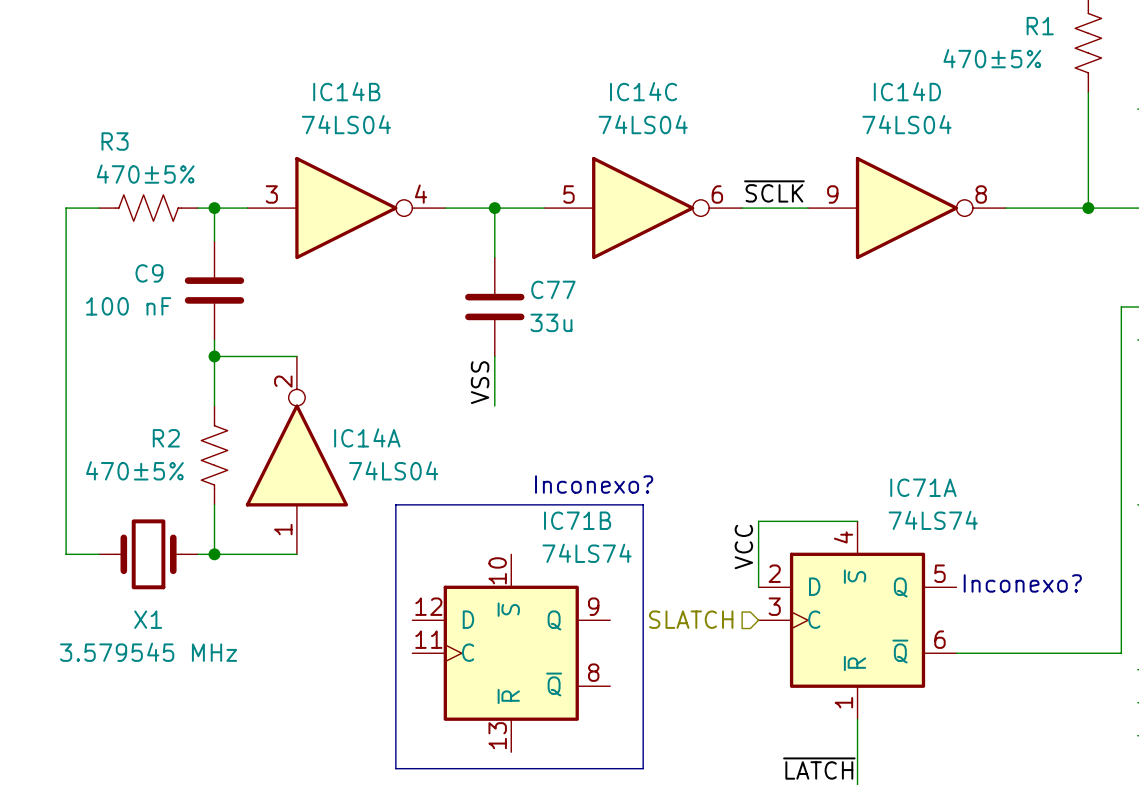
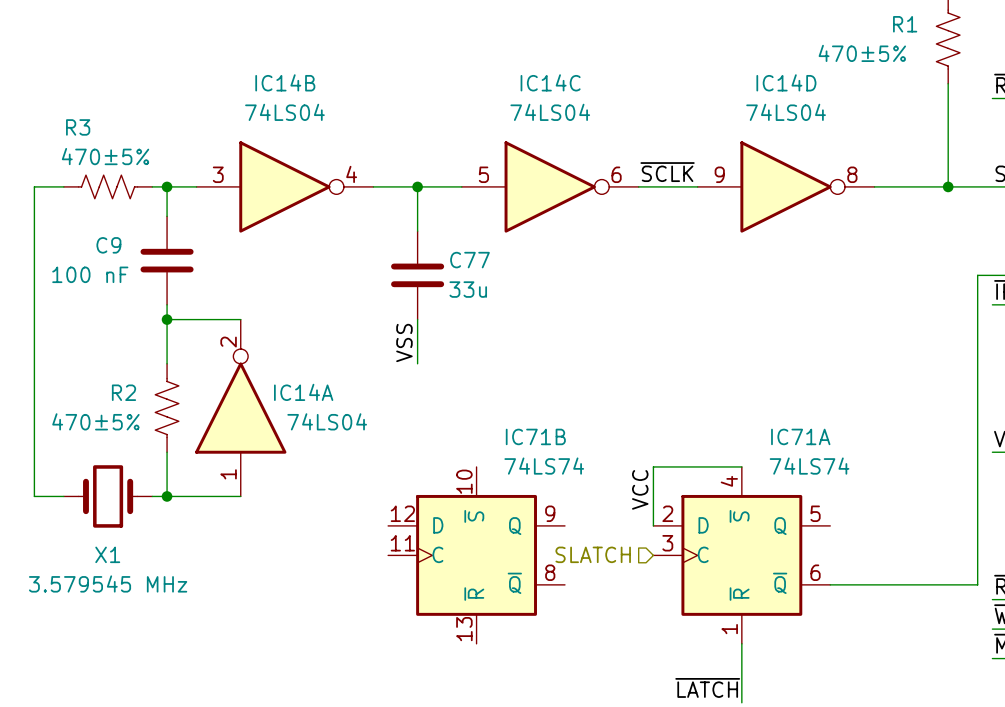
text: Inconexo? (594, 484) -> none
line: (395, 504) (643, 504) (643, 768) (395, 768) (395, 504) -> none
text: Inconexo? (1022, 583) -> none
IC71B position: (511, 653) -> (476, 555)

